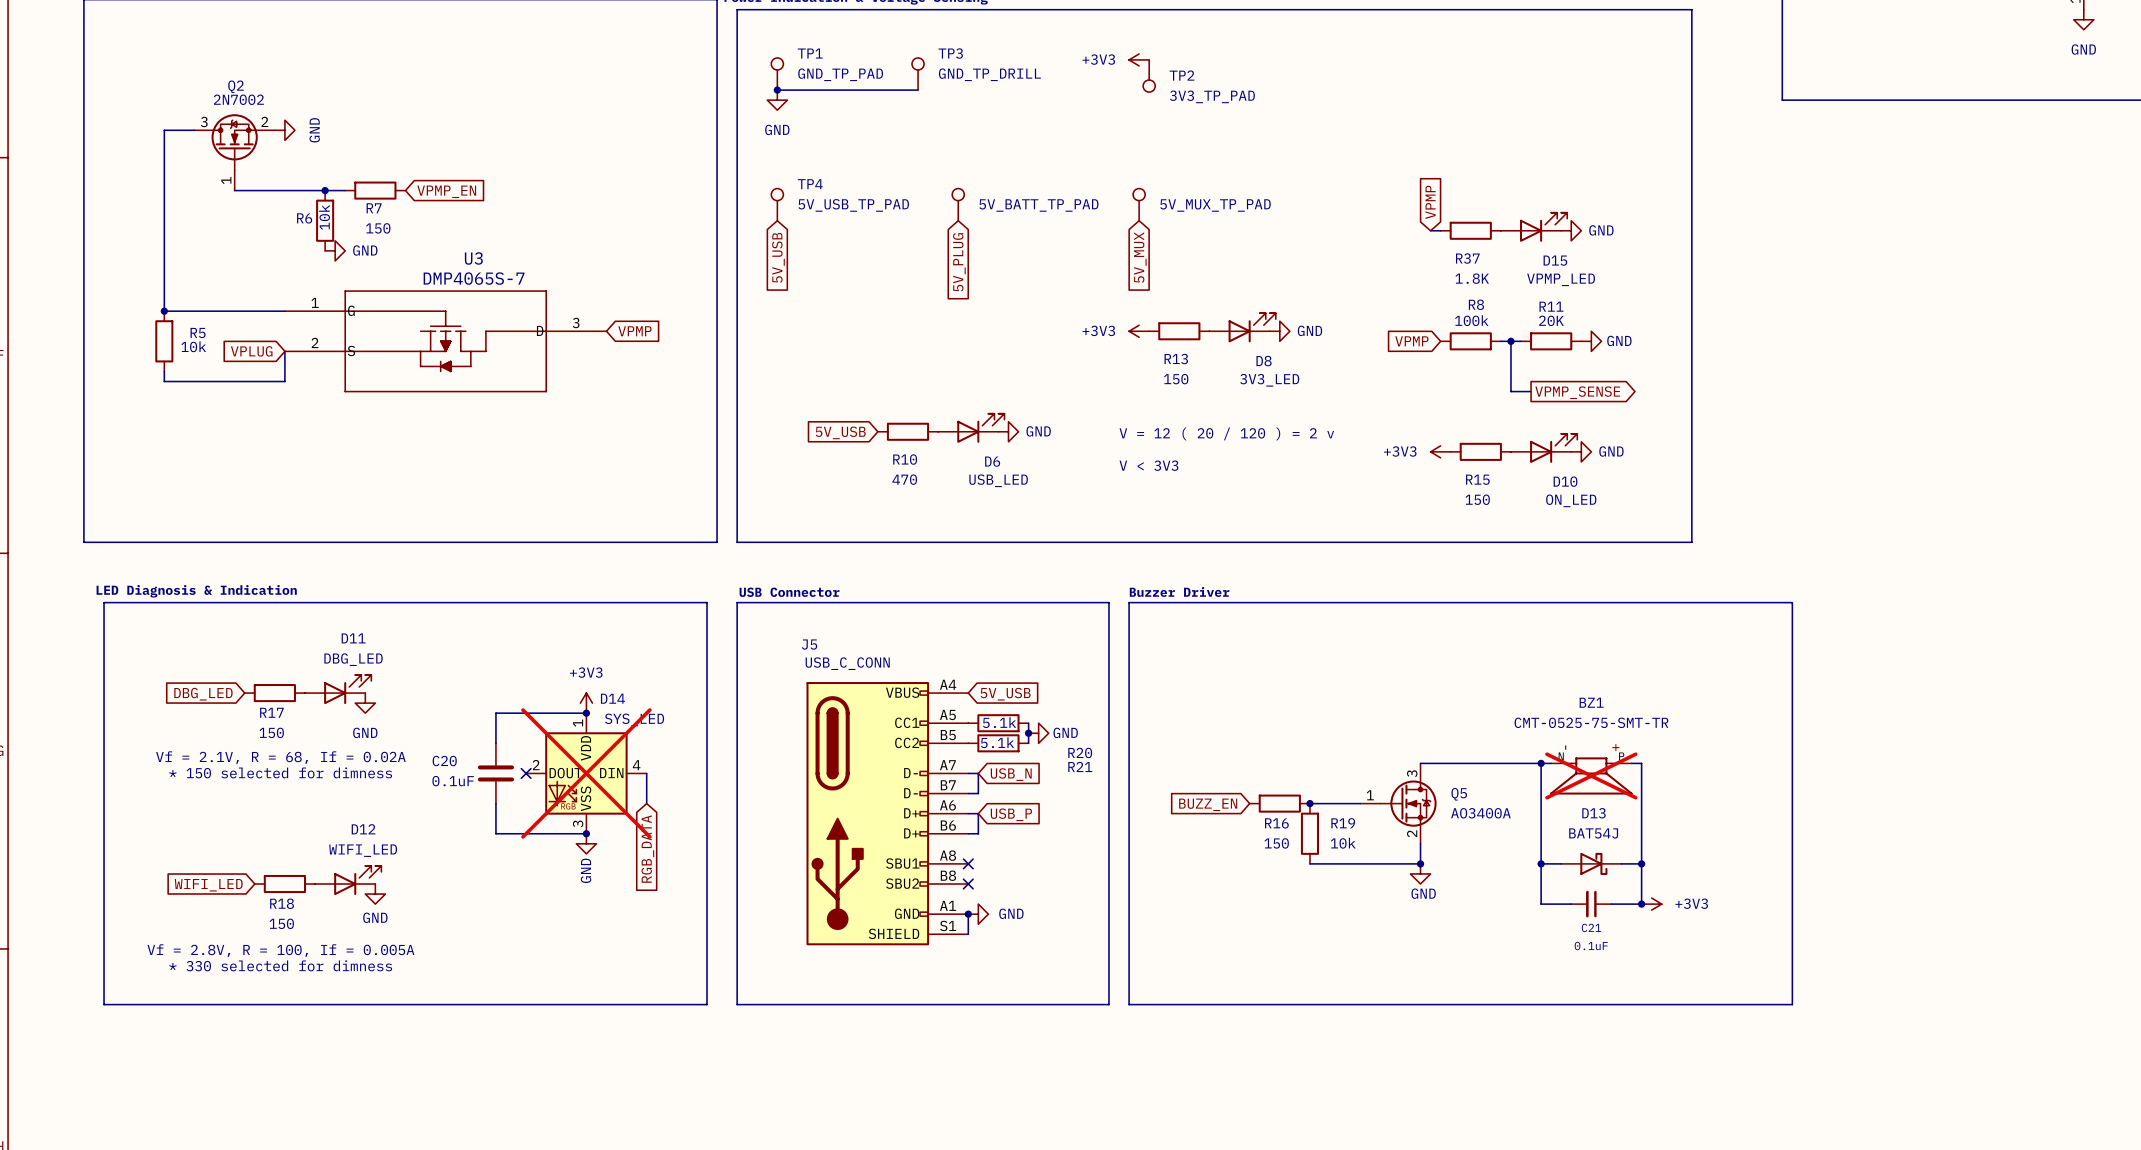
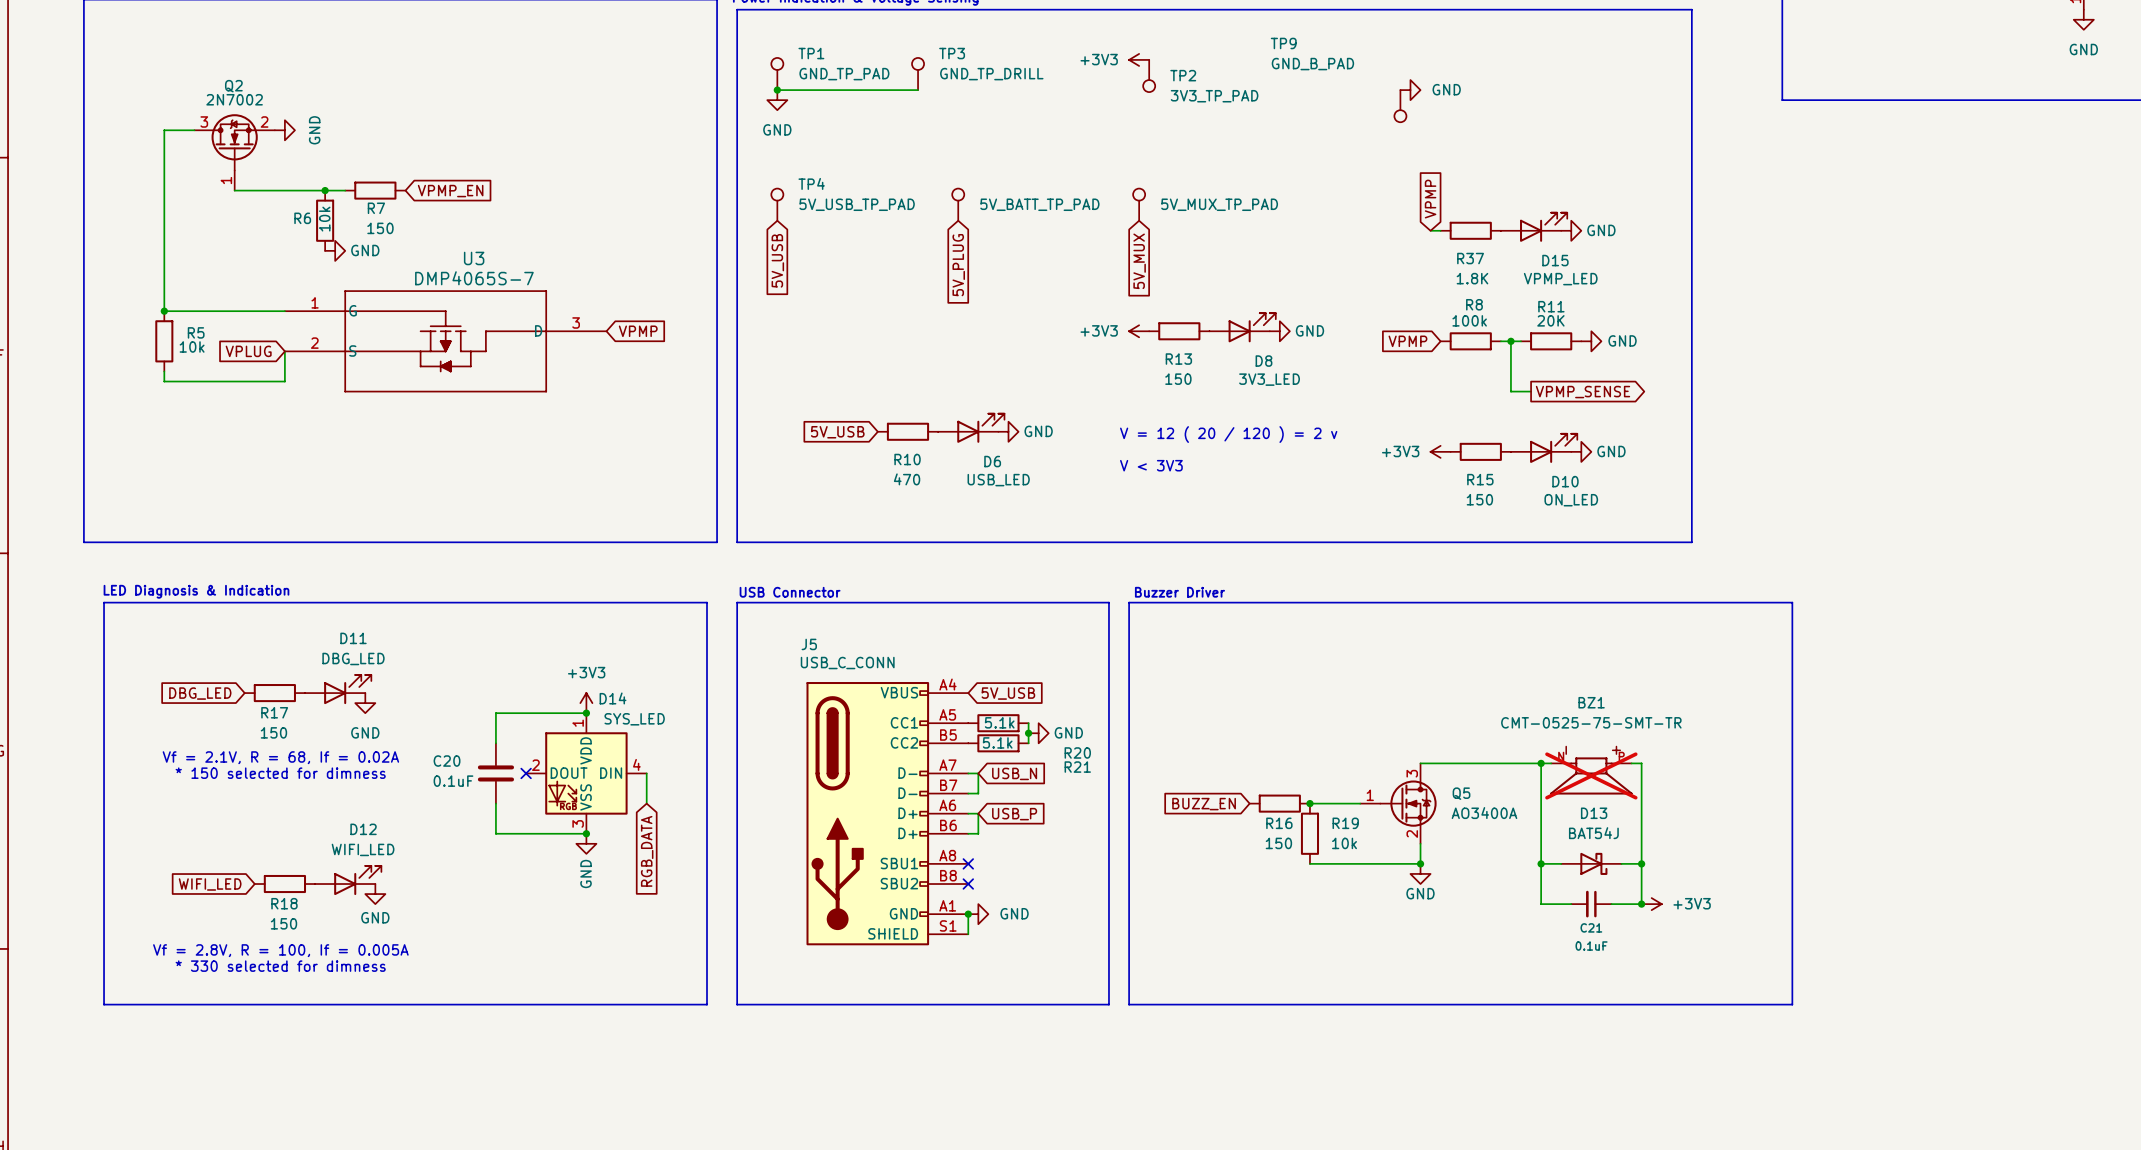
power symbol: none -> GND (1410, 90)
TP9: none -> GND_B_PAD (1400, 106)
D14 do-not-place cross: (586, 773) -> none

